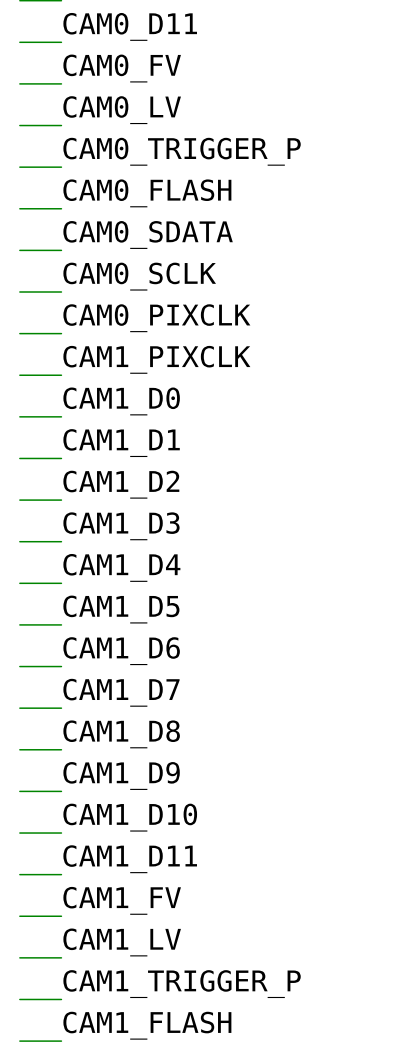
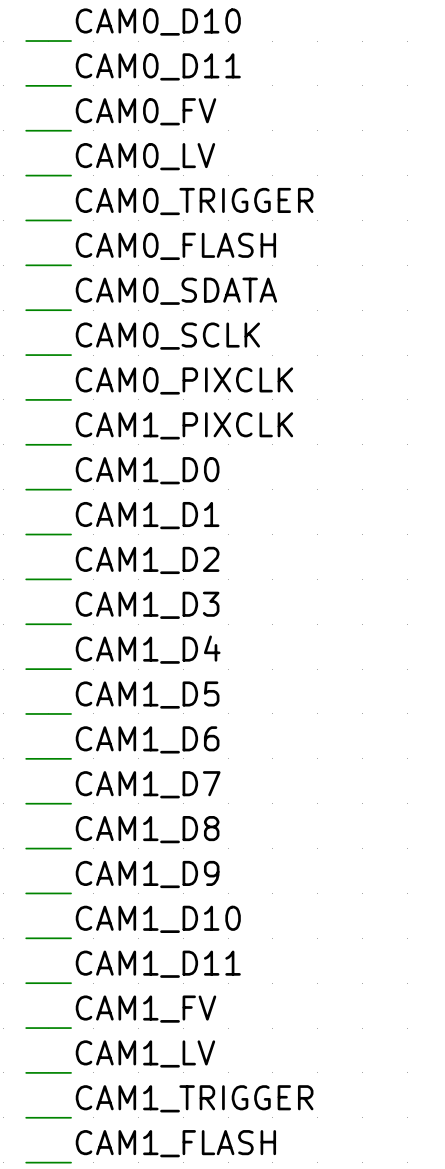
label: CAM0_TRIGGER_P (182, 151) -> CAM0_TRIGGER (194, 201)
label: CAM1_TRIGGER_P (182, 984) -> CAM1_TRIGGER (194, 1098)

